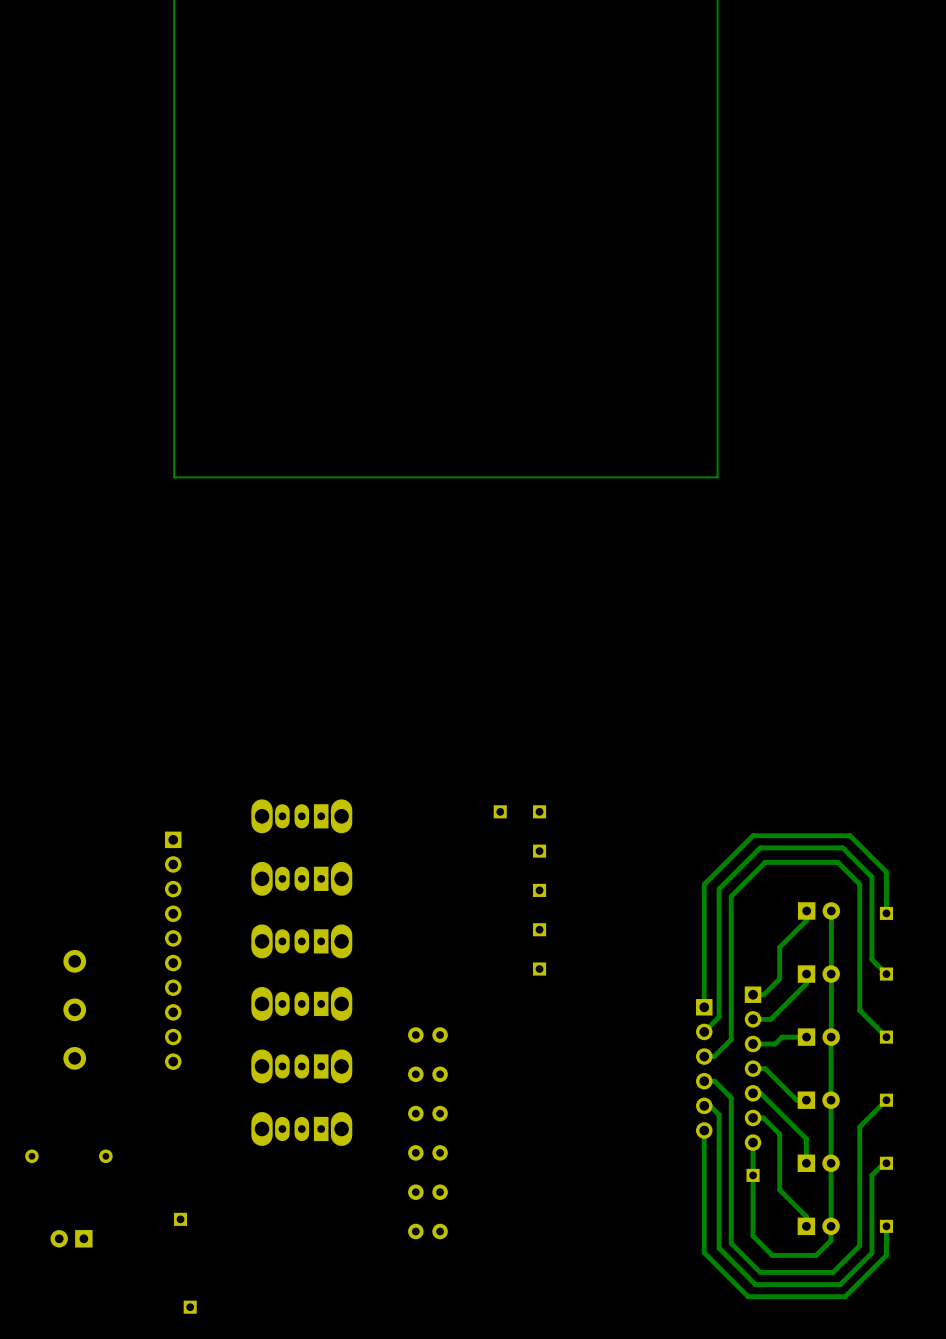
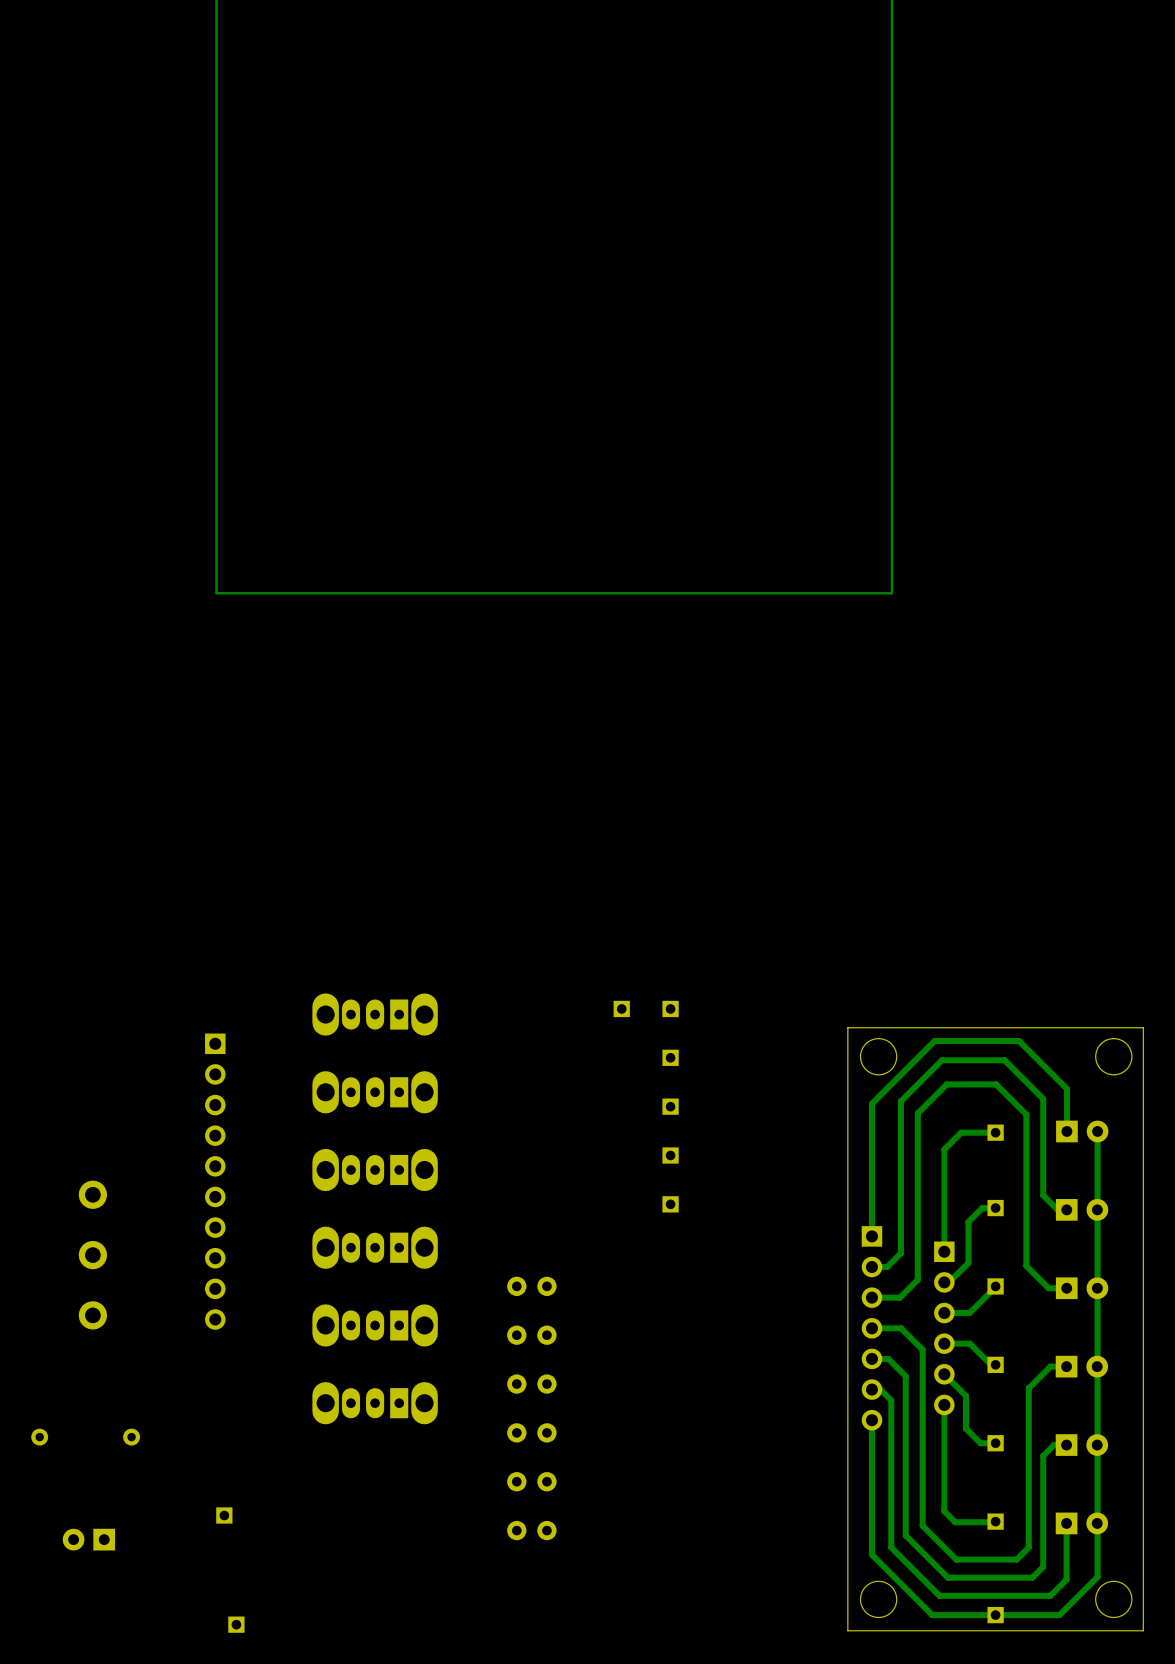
board edge: none -> (1143, 1027) (847, 1027) (847, 1630) (1143, 1630) (1143, 1027)
round board edge: none -> [859, 1038, 898, 1076]
round board edge: none -> [1095, 1038, 1133, 1076]
track: (806, 910) (806, 920) (779, 947) (779, 978) (763, 994) (753, 994) -> none
part: (819, 910) -> none
track: (831, 910) (831, 1240) (816, 1255) (772, 1255) (753, 1236) (753, 1142) -> none
track: none -> (1066, 1131) (1066, 1088) (1019, 1041) (934, 1041) (871, 1103) (871, 1236)
part: none -> (1082, 1131)
track: none -> (1097, 1131) (1097, 1577) (1059, 1615) (932, 1615) (871, 1554) (871, 1420)
track: none -> (995, 1132) (961, 1132) (944, 1149) (944, 1251)
part: none -> (995, 1132)
track: (886, 913) (886, 872) (850, 835) (753, 835) (704, 884) (704, 1007) -> none
part: (886, 913) -> none
track: none -> (995, 1208) (982, 1208) (968, 1221) (968, 1262) (948, 1282) (944, 1282)
part: none -> (995, 1208)
track: none -> (1066, 1209) (1057, 1209) (1043, 1195) (1043, 1098) (1004, 1060) (941, 1060) (900, 1101) (900, 1253) (887, 1267) (871, 1267)
part: none -> (1082, 1209)
track: (806, 974) (806, 983) (770, 1019) (753, 1019) -> none
part: (818, 974) -> none
track: (881, 974) (886, 974) (871, 959) (871, 877) (842, 847) (760, 847) (719, 889) (719, 1017) (704, 1031) -> none
part: (886, 974) -> none
part footprint: [744, 986, 762, 1151] -> [934, 1241, 955, 1416]
part footprint: [696, 999, 713, 1139] -> [861, 1226, 883, 1431]
part: none -> (995, 1286)
track: none -> (1066, 1288) (1048, 1288) (1026, 1265) (1026, 1114) (996, 1084) (946, 1084) (917, 1113) (917, 1279) (899, 1297) (871, 1297)
part: none -> (1082, 1288)
track: (806, 1037) (782, 1037) (775, 1044) (753, 1044) -> none
part: (818, 1037) -> none
track: (886, 1037) (859, 1010) (859, 884) (837, 862) (765, 862) (731, 896) (731, 1039) (714, 1056) (704, 1056) -> none
part: (886, 1037) -> none
track: none -> (991, 1290) (995, 1286) (969, 1313) (944, 1313)
track: none -> (871, 1328) (901, 1328) (922, 1349) (922, 1525) (956, 1559) (1016, 1559) (1028, 1547) (1028, 1388) (1050, 1366) (1066, 1366)
track: (753, 1068) (765, 1068) (796, 1100) (806, 1100) -> none
track: (704, 1081) (714, 1081) (731, 1097) (731, 1243) (760, 1272) (833, 1272) (859, 1245) (859, 1126) (886, 1100) -> none
track: none -> (944, 1343) (969, 1343) (991, 1365) (995, 1364)
track: none -> (871, 1358) (888, 1358) (905, 1376) (905, 1535) (947, 1577) (1032, 1577) (1043, 1566) (1043, 1455) (1054, 1445) (1066, 1445)
track: (753, 1093) (760, 1093) (806, 1139) (806, 1163) -> none
part: none -> (995, 1364)
part: none -> (1081, 1366)
part: (818, 1100) -> none
part: (886, 1100) -> none
track: (704, 1105) (710, 1105) (719, 1114) (719, 1248) (755, 1284) (840, 1284) (871, 1253) (871, 1175) (884, 1163) (886, 1163) -> none
track: none -> (944, 1374) (966, 1396) (966, 1428) (980, 1443) (995, 1443)
track: (753, 1117) (763, 1117) (779, 1134) (779, 1189) (806, 1216) (806, 1226) -> none
track: none -> (871, 1389) (880, 1389) (891, 1400) (891, 1547) (939, 1595) (1050, 1595) (1066, 1579) (1066, 1523)
track: (704, 1130) (704, 1252) (748, 1296) (845, 1296) (886, 1255) (886, 1226) -> none
track: none -> (944, 1404) (944, 1511) (955, 1522) (995, 1521)
part: none -> (995, 1443)
part: none -> (1081, 1445)
part: (818, 1163) -> none
part: (886, 1163) -> none
part: (753, 1175) -> none
part: none -> (995, 1521)
part: none -> (1081, 1523)
part: (818, 1226) -> none
part: (886, 1226) -> none
round board edge: none -> [859, 1580, 898, 1619]
round board edge: none -> [1095, 1580, 1133, 1619]
part: none -> (995, 1615)

